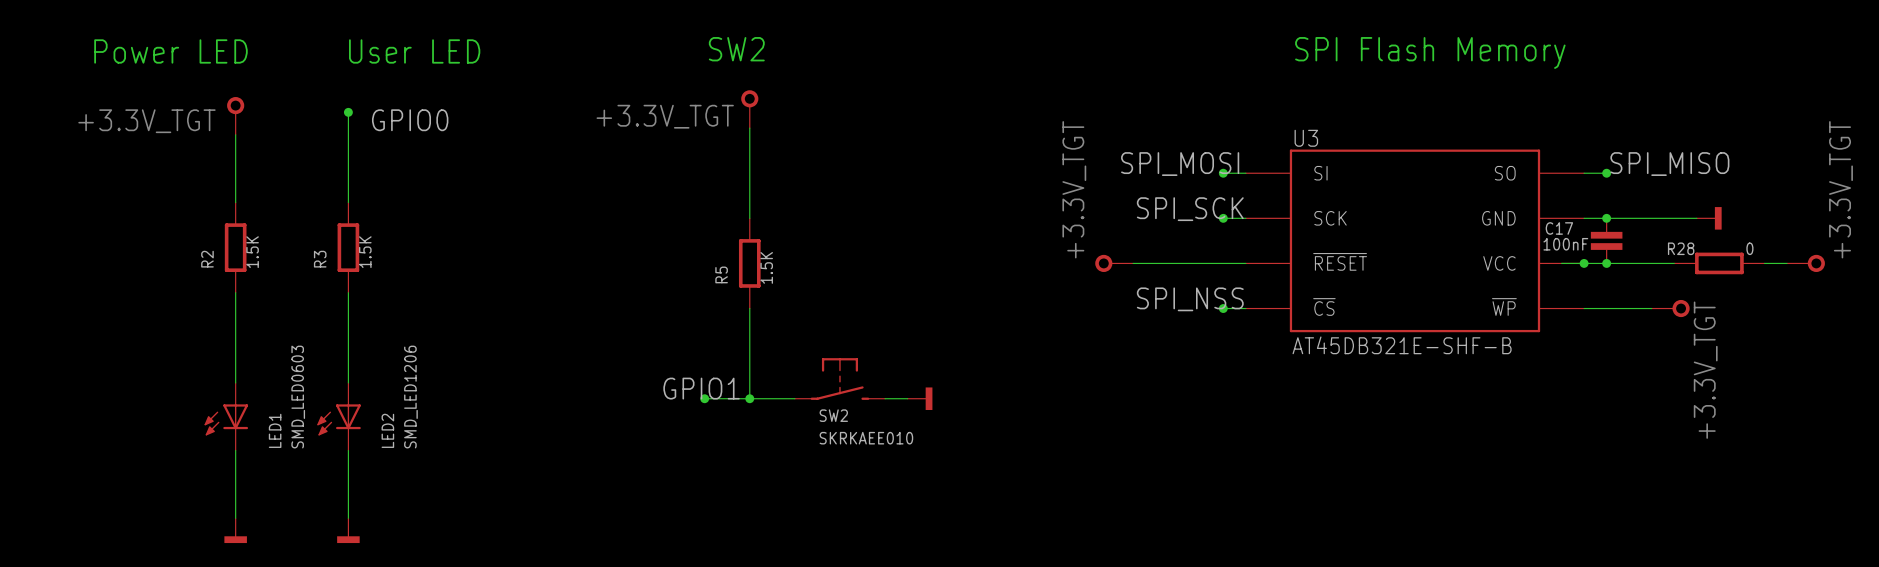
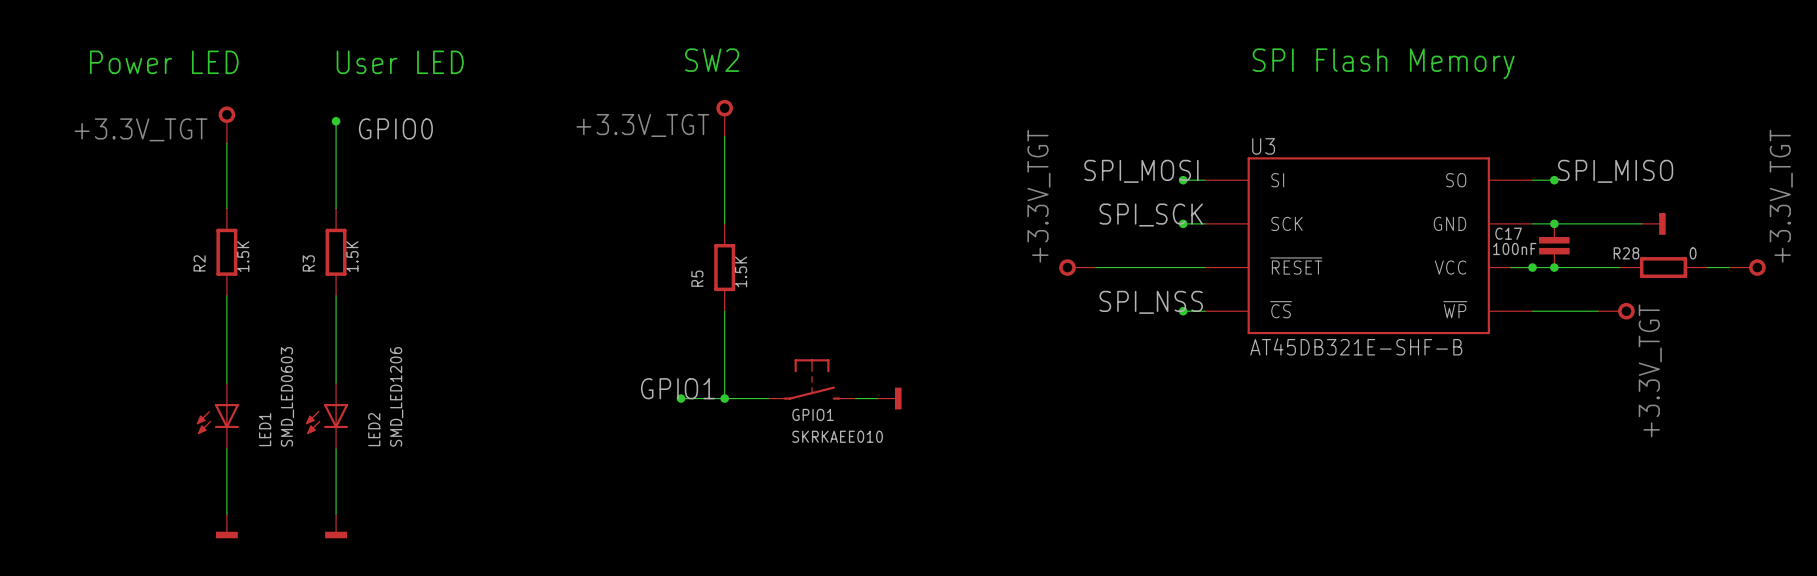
SW2 name: SW2 (833, 415) -> GPIO1 (813, 414)

